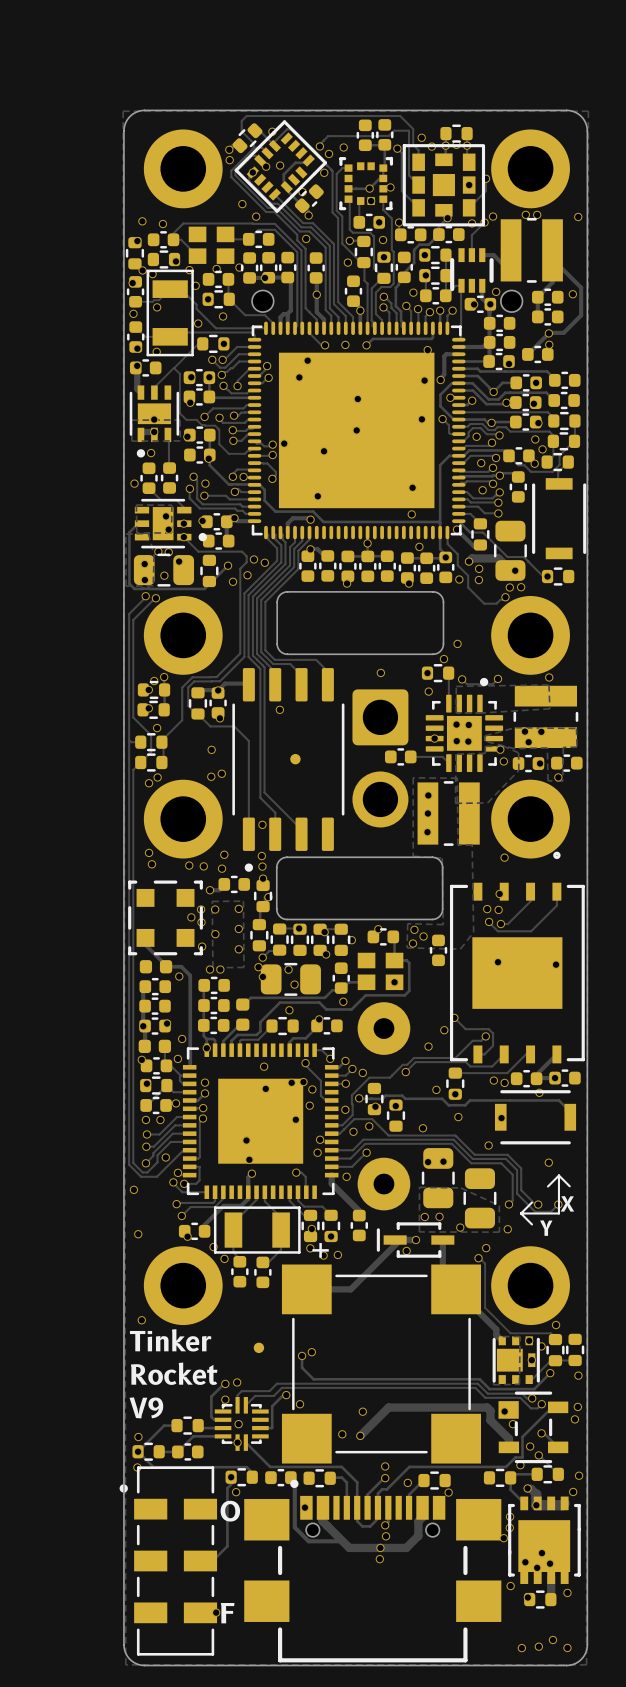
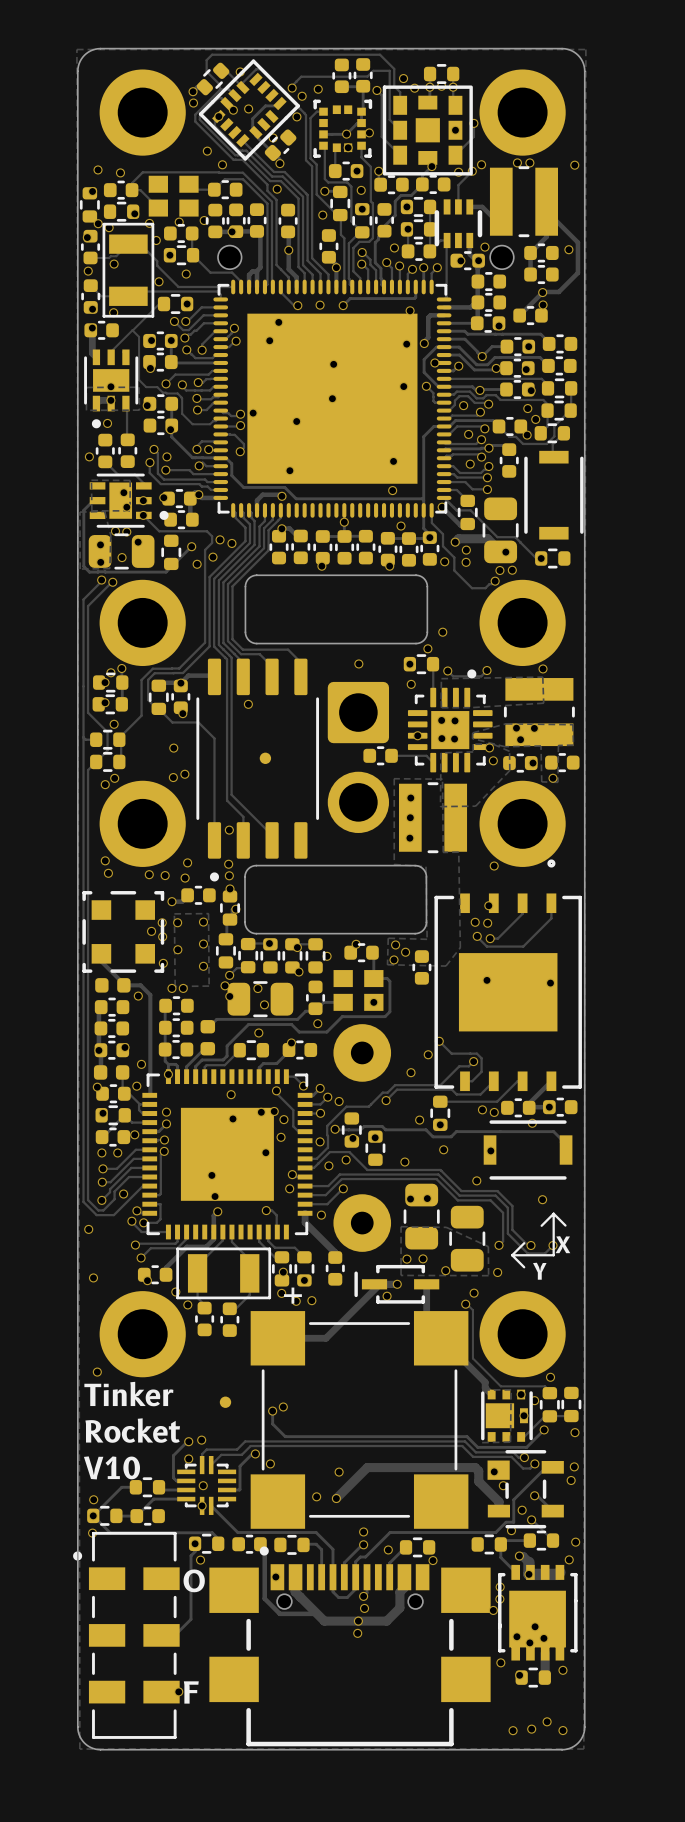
text: V9 (146, 1407) -> V10 (111, 1467)

